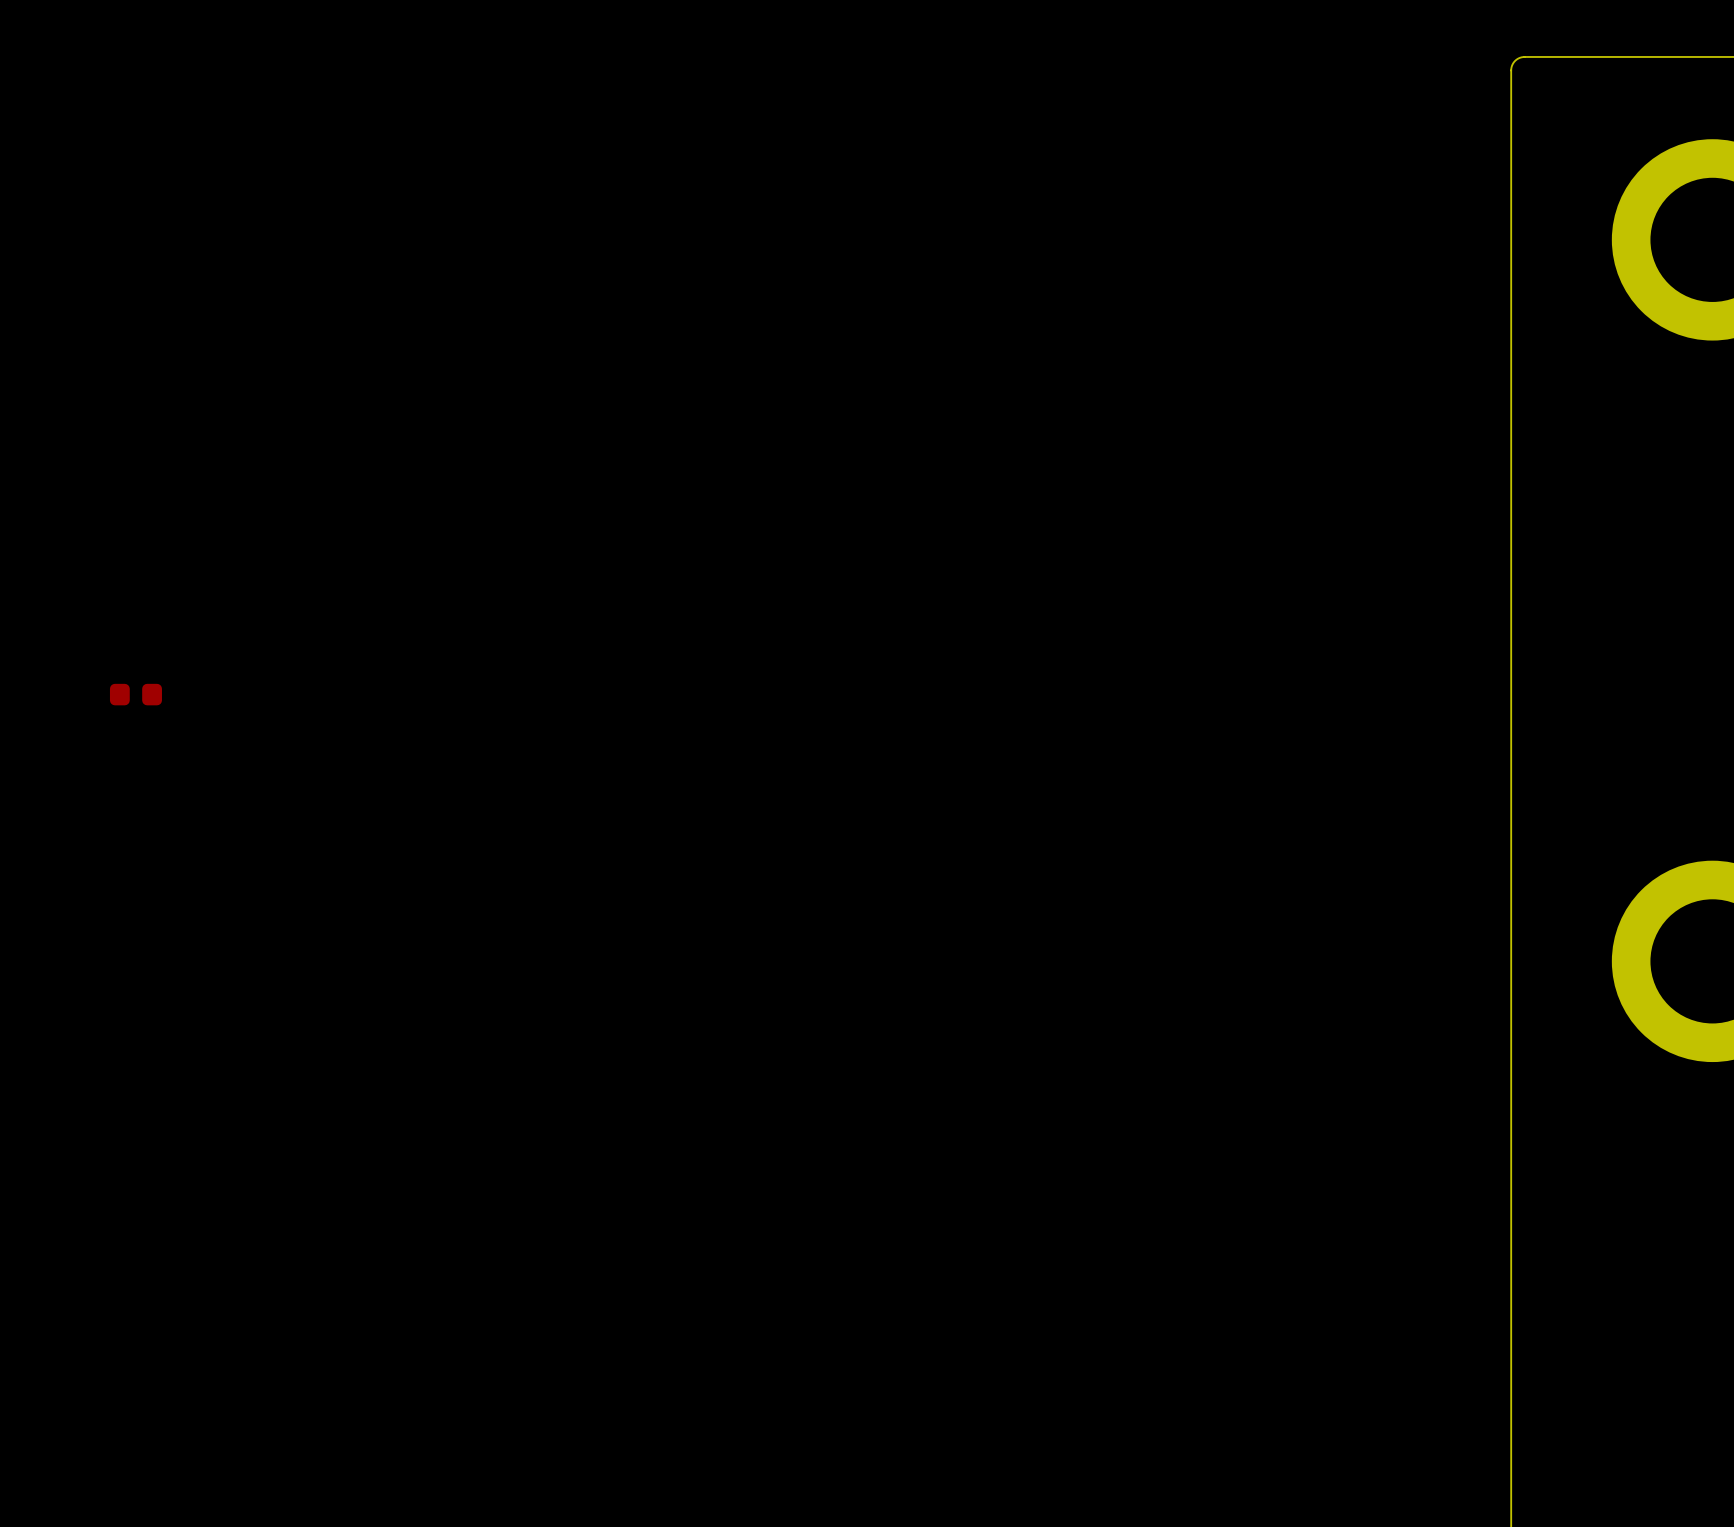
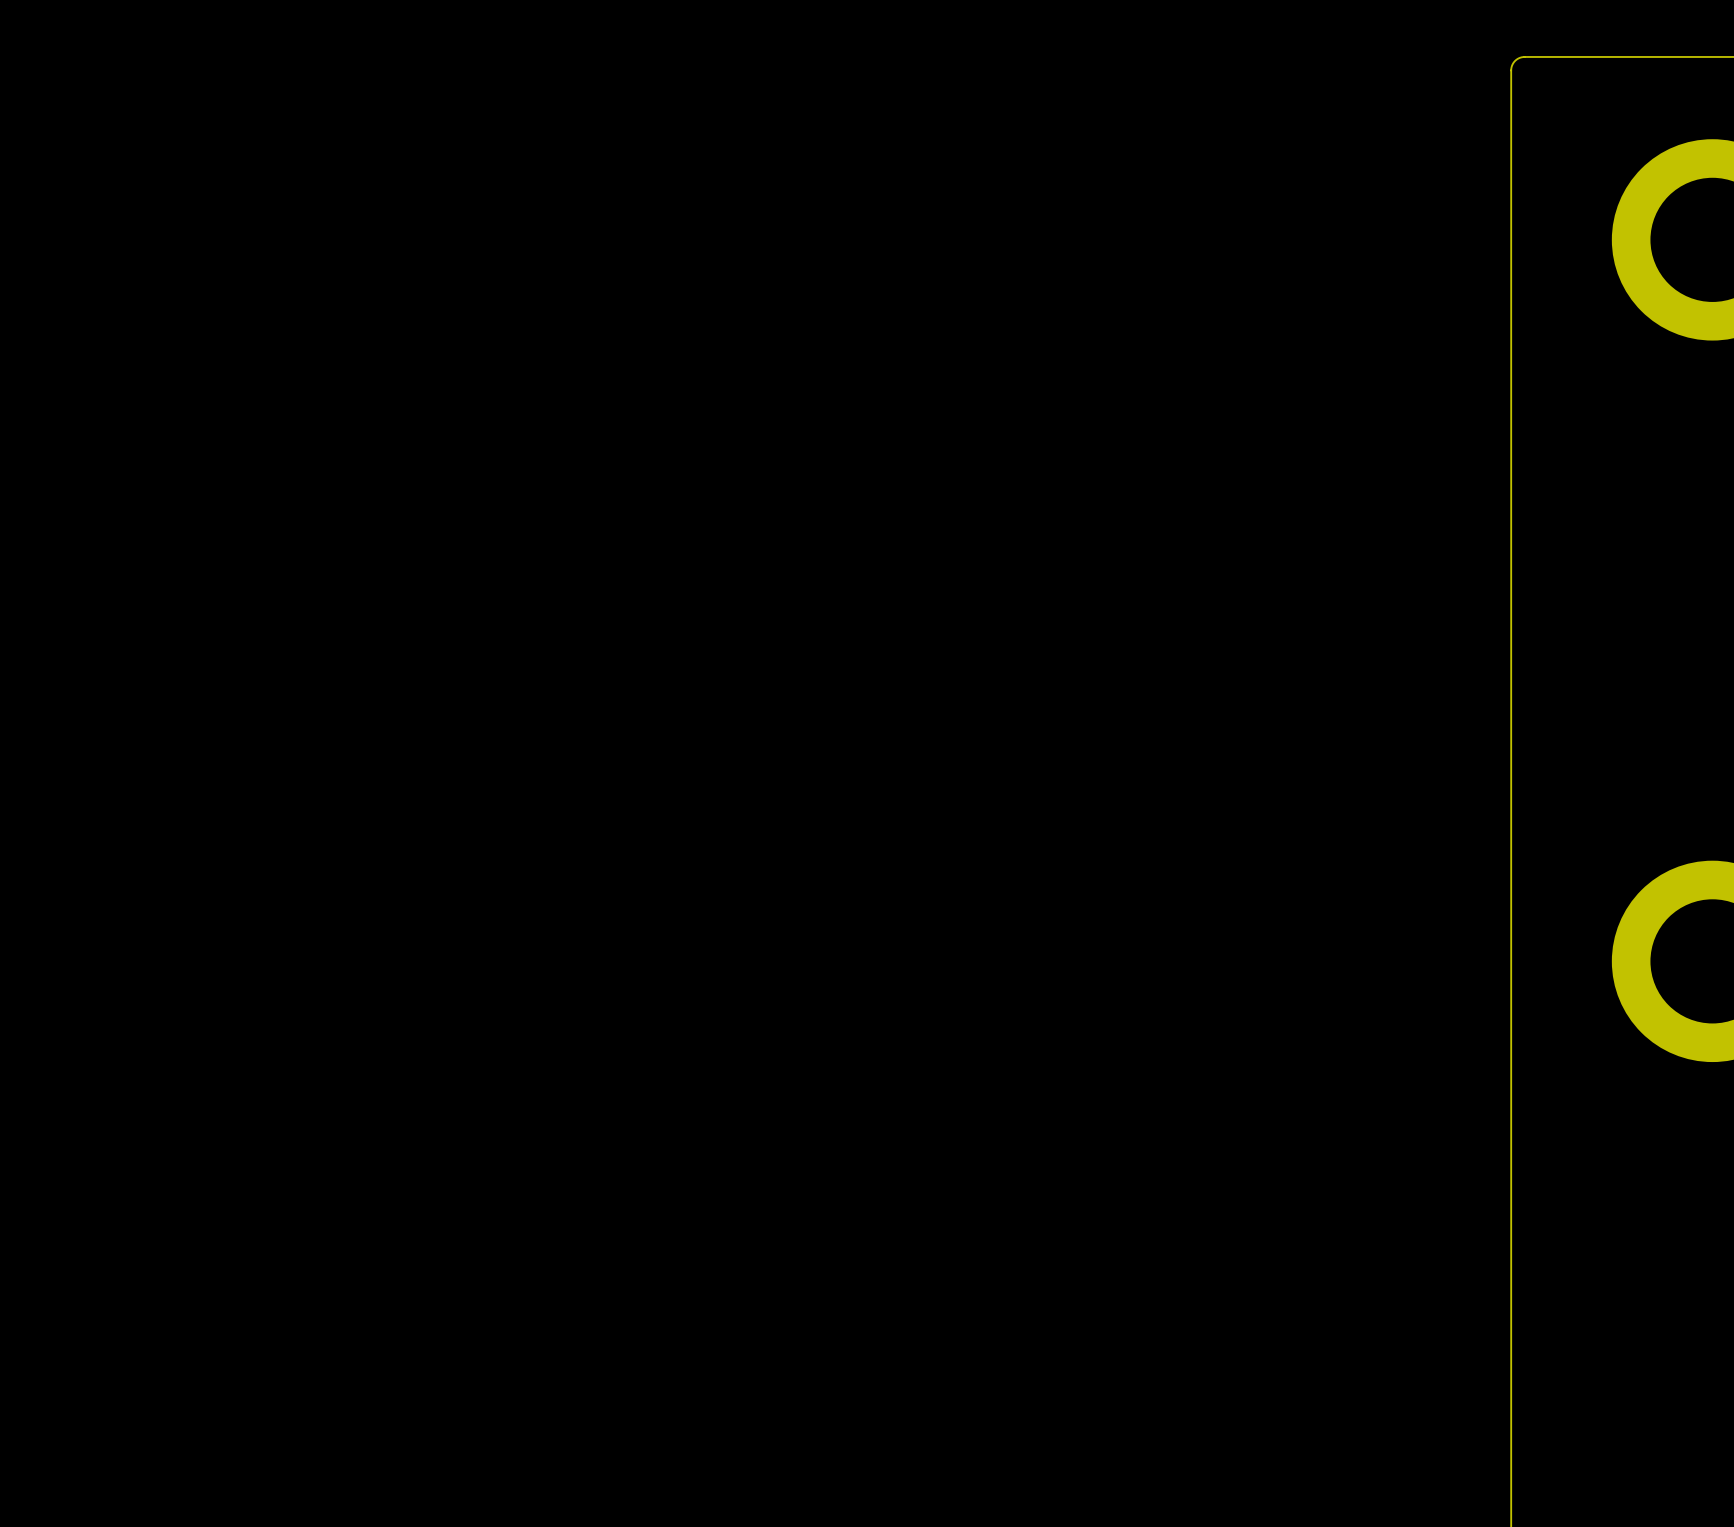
part: (135, 694) -> none

